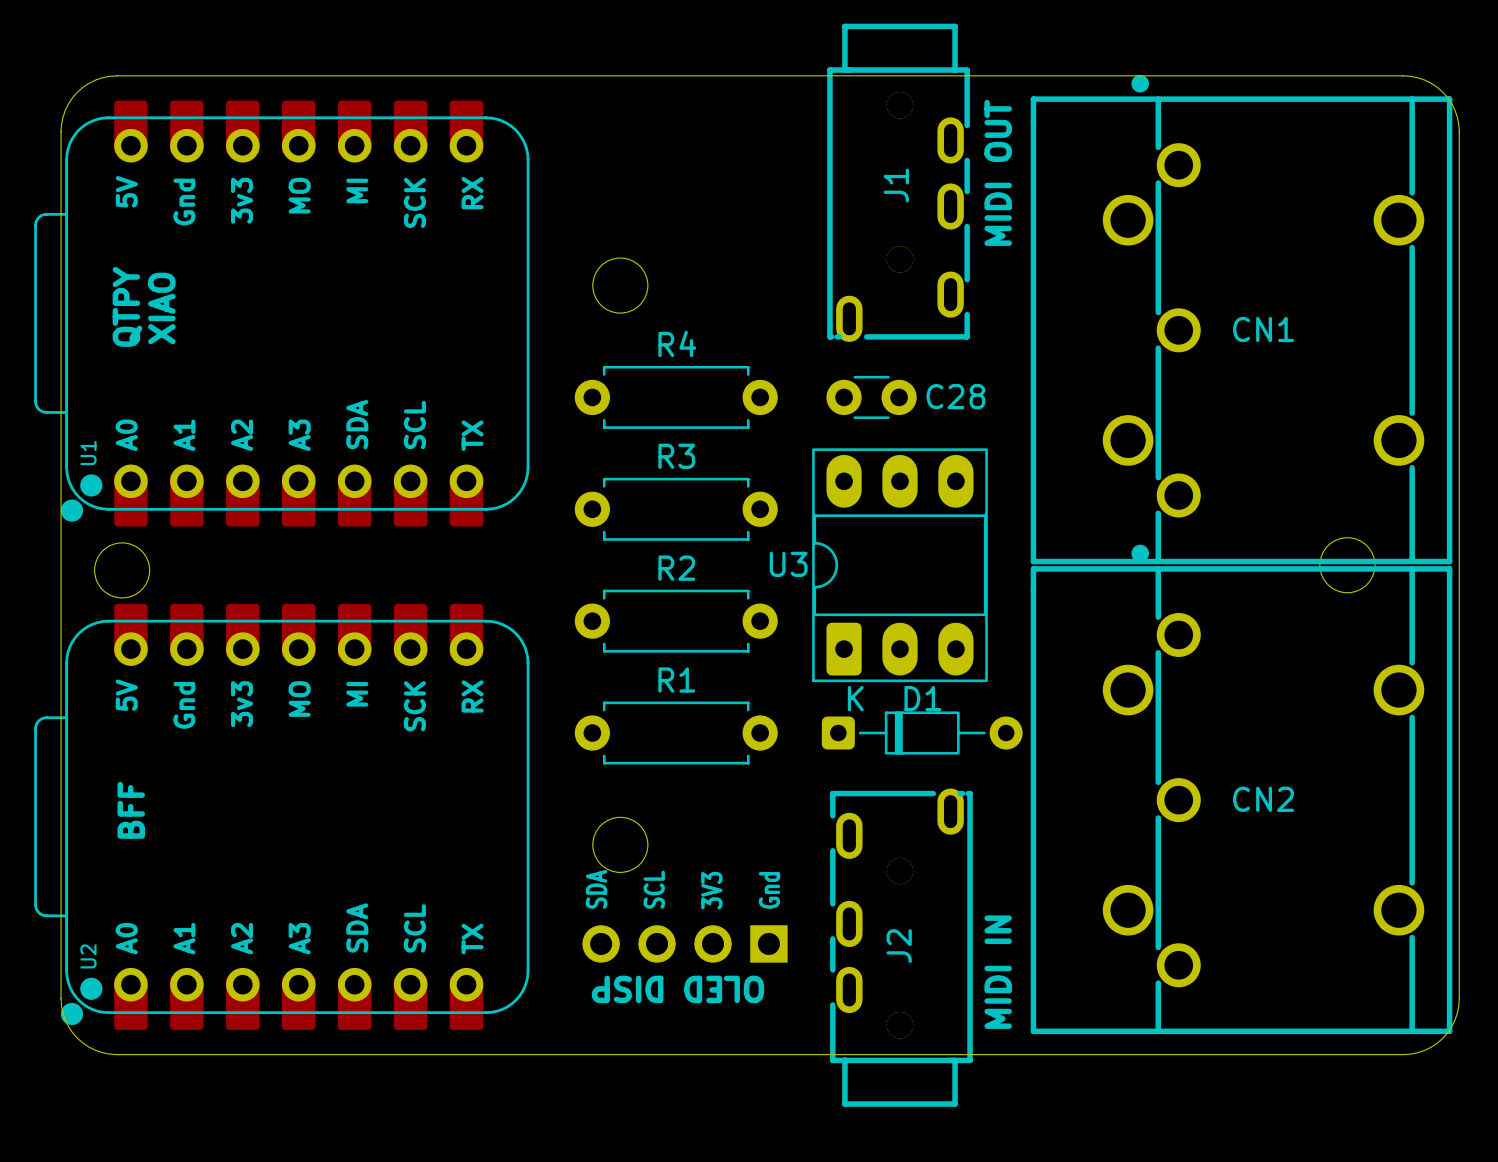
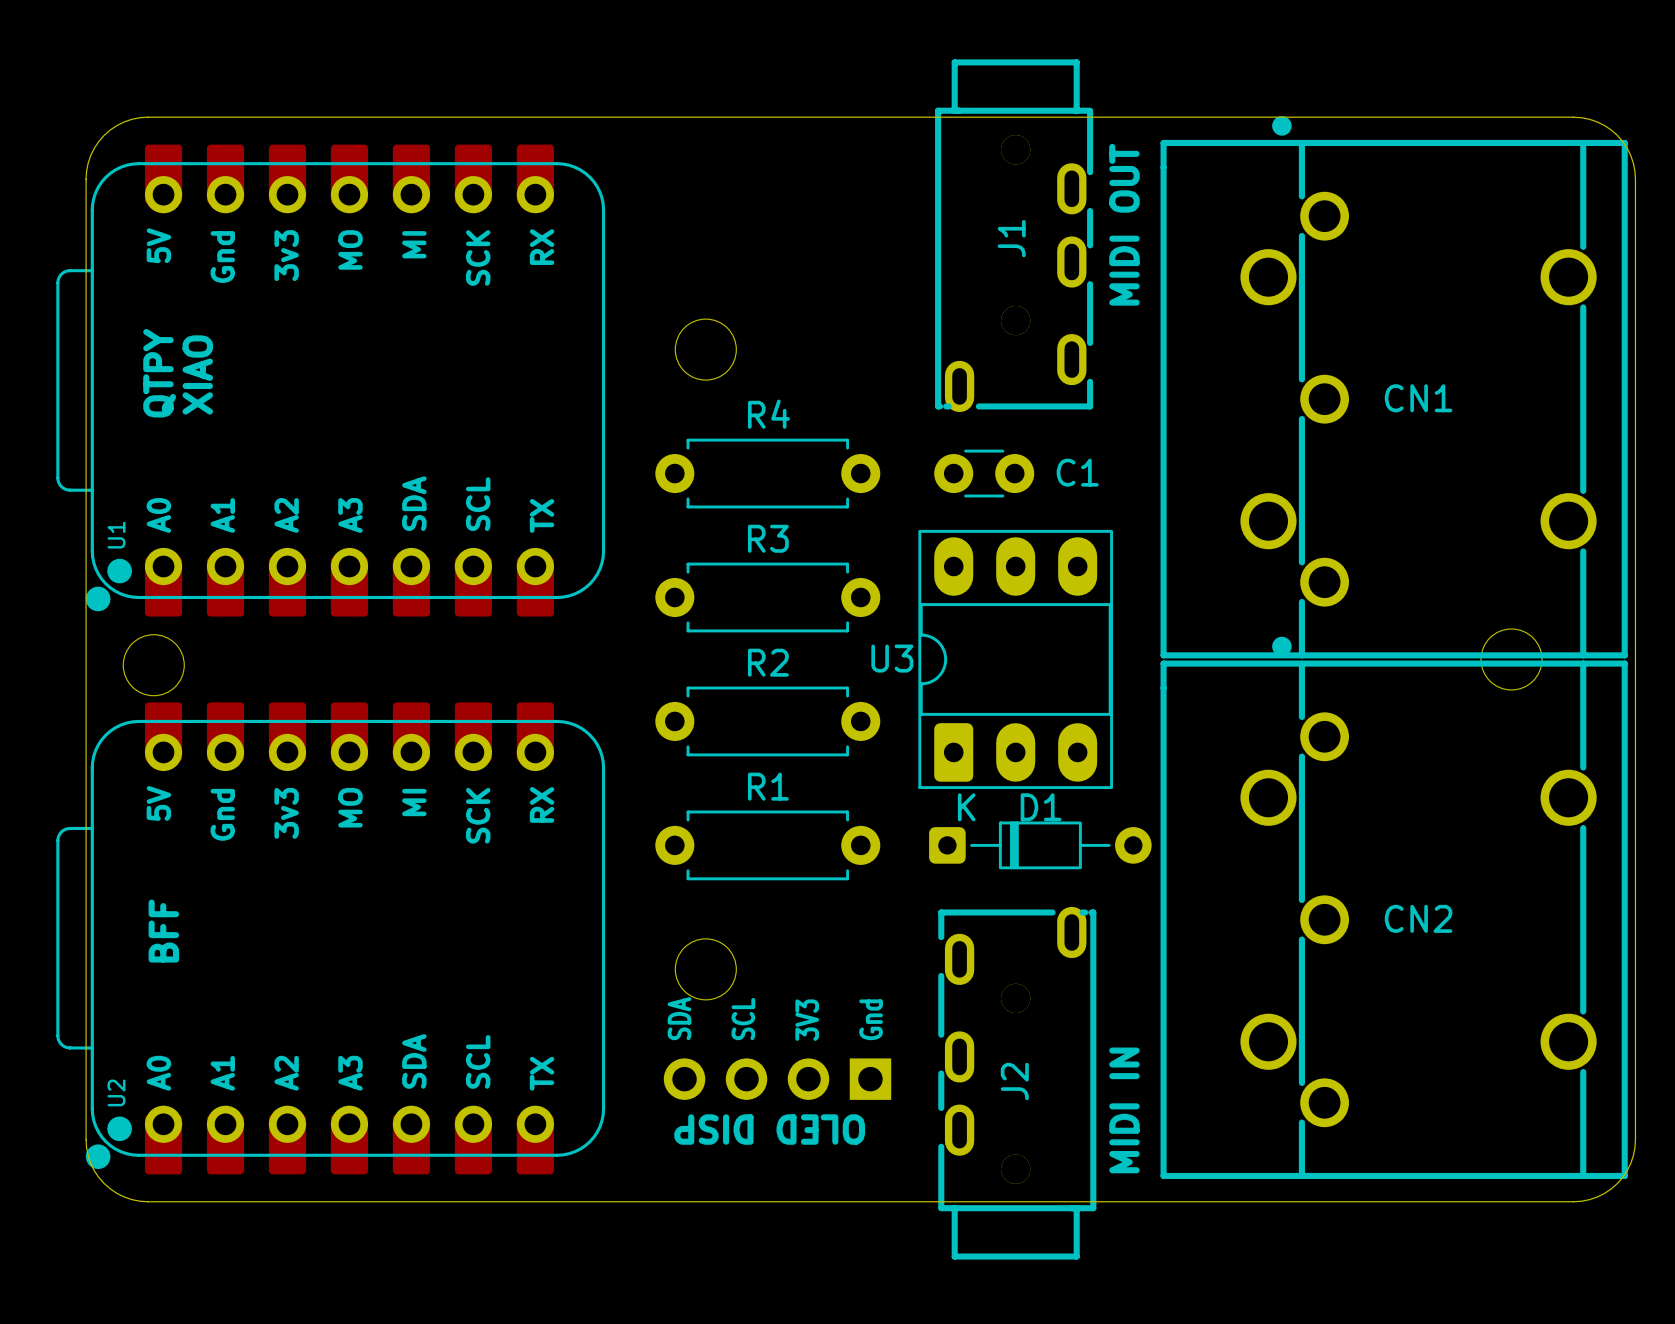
C28 name: C28 (955, 396) -> C1 (1077, 472)

